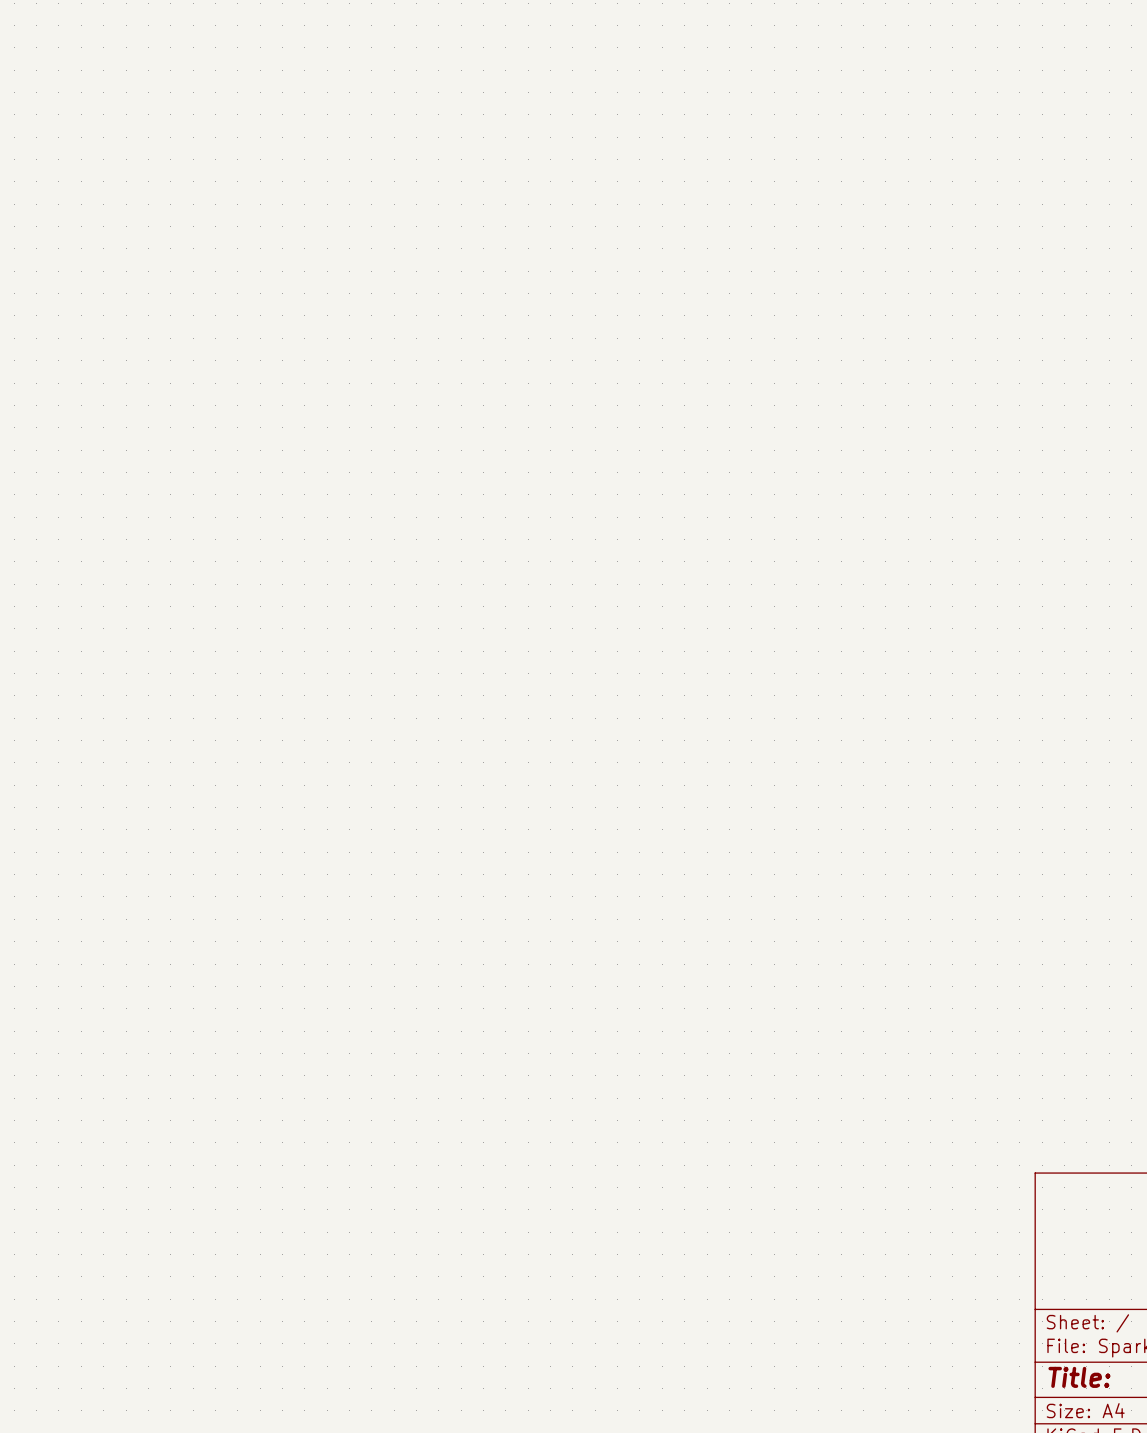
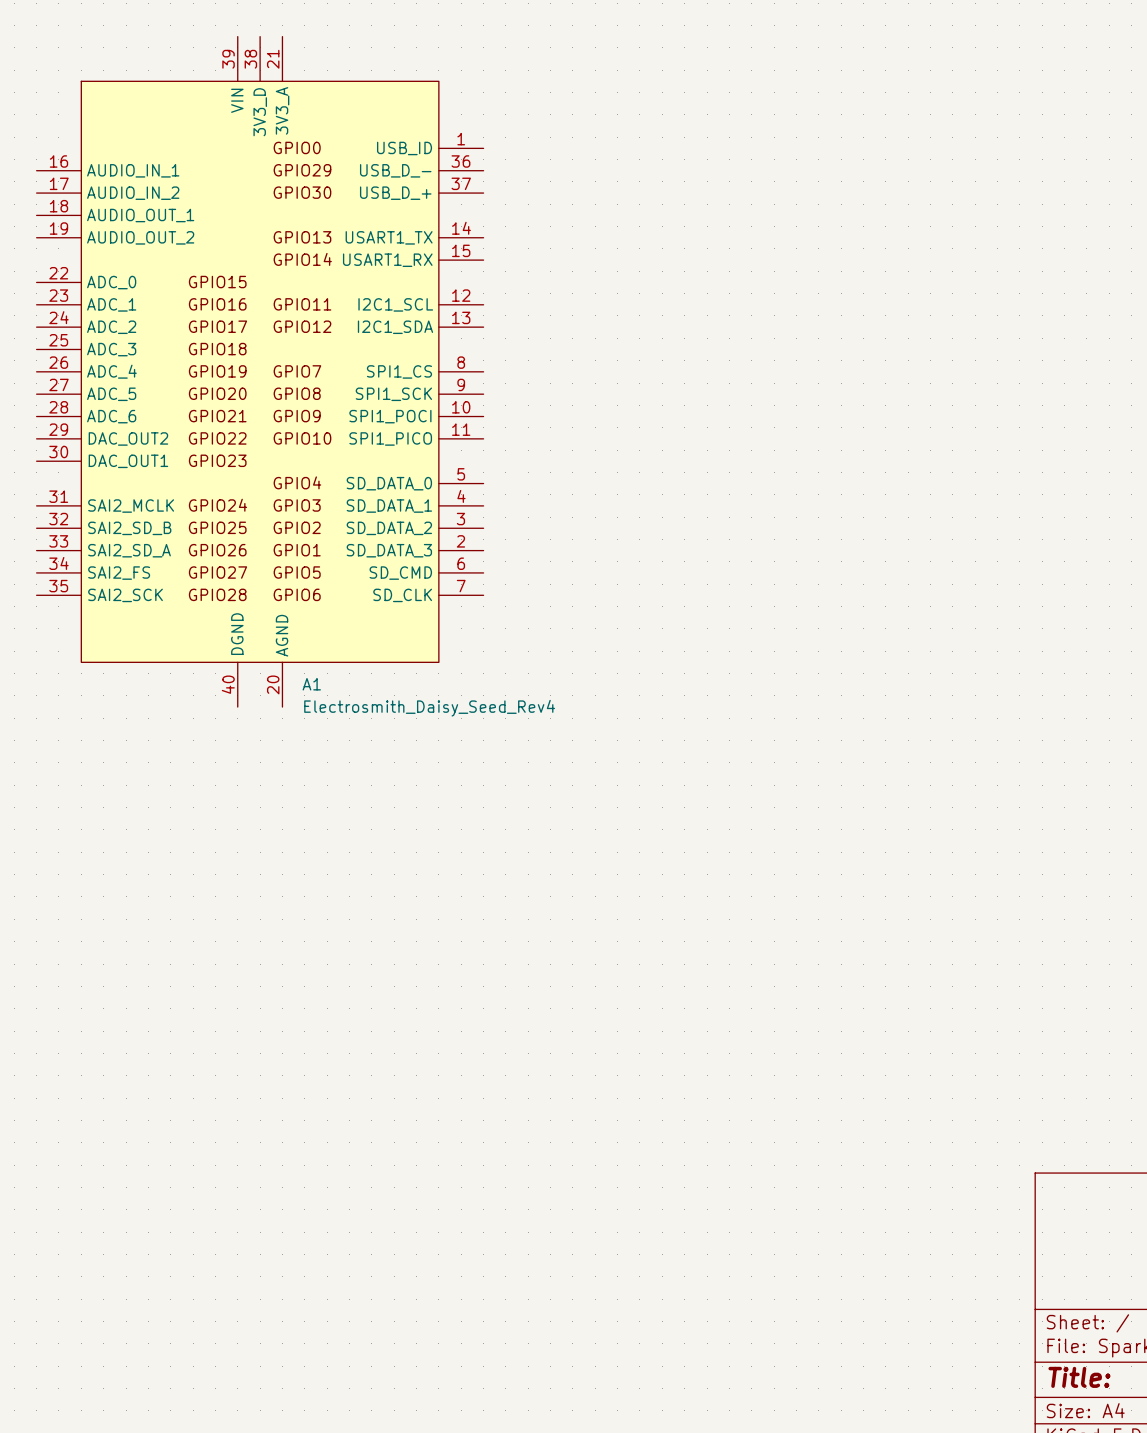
A1: none -> Electrosmith_Daisy_Seed_Rev4 (260, 371)

